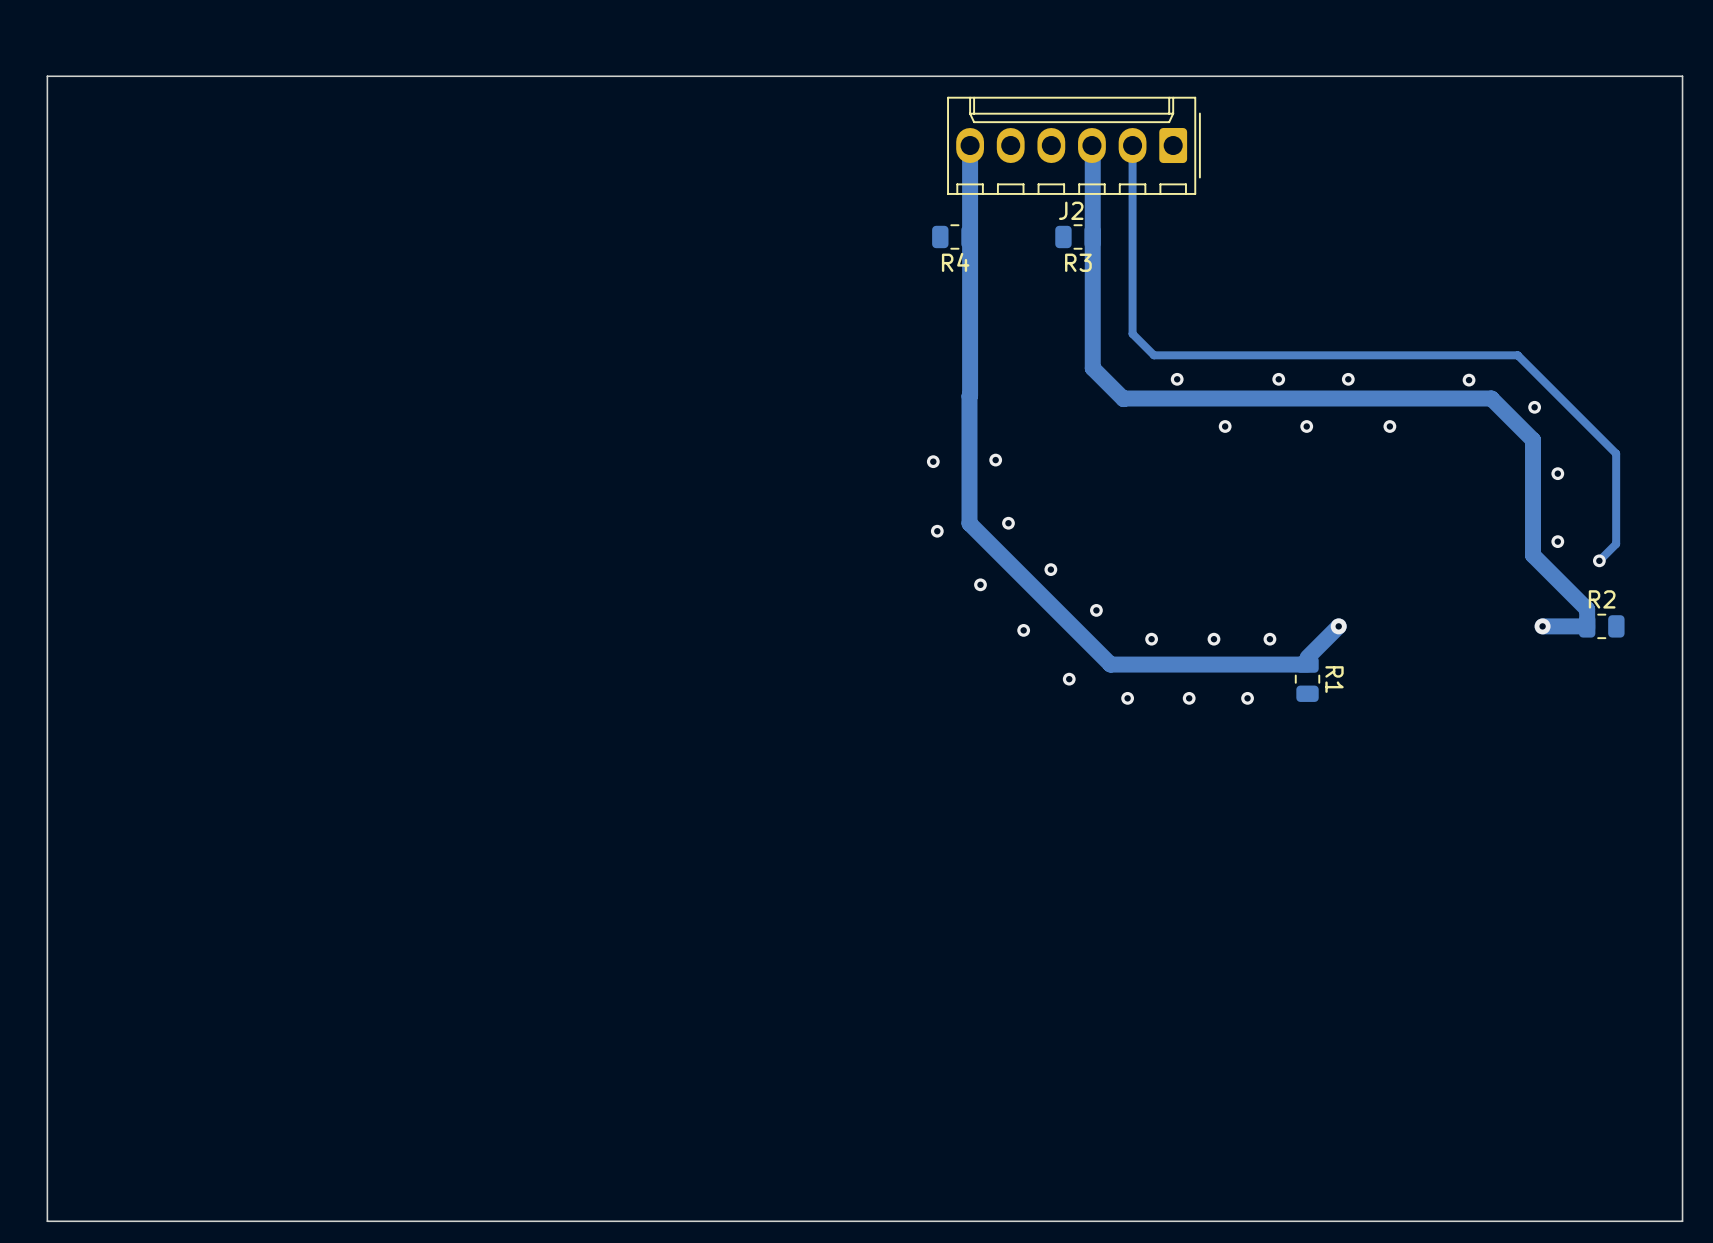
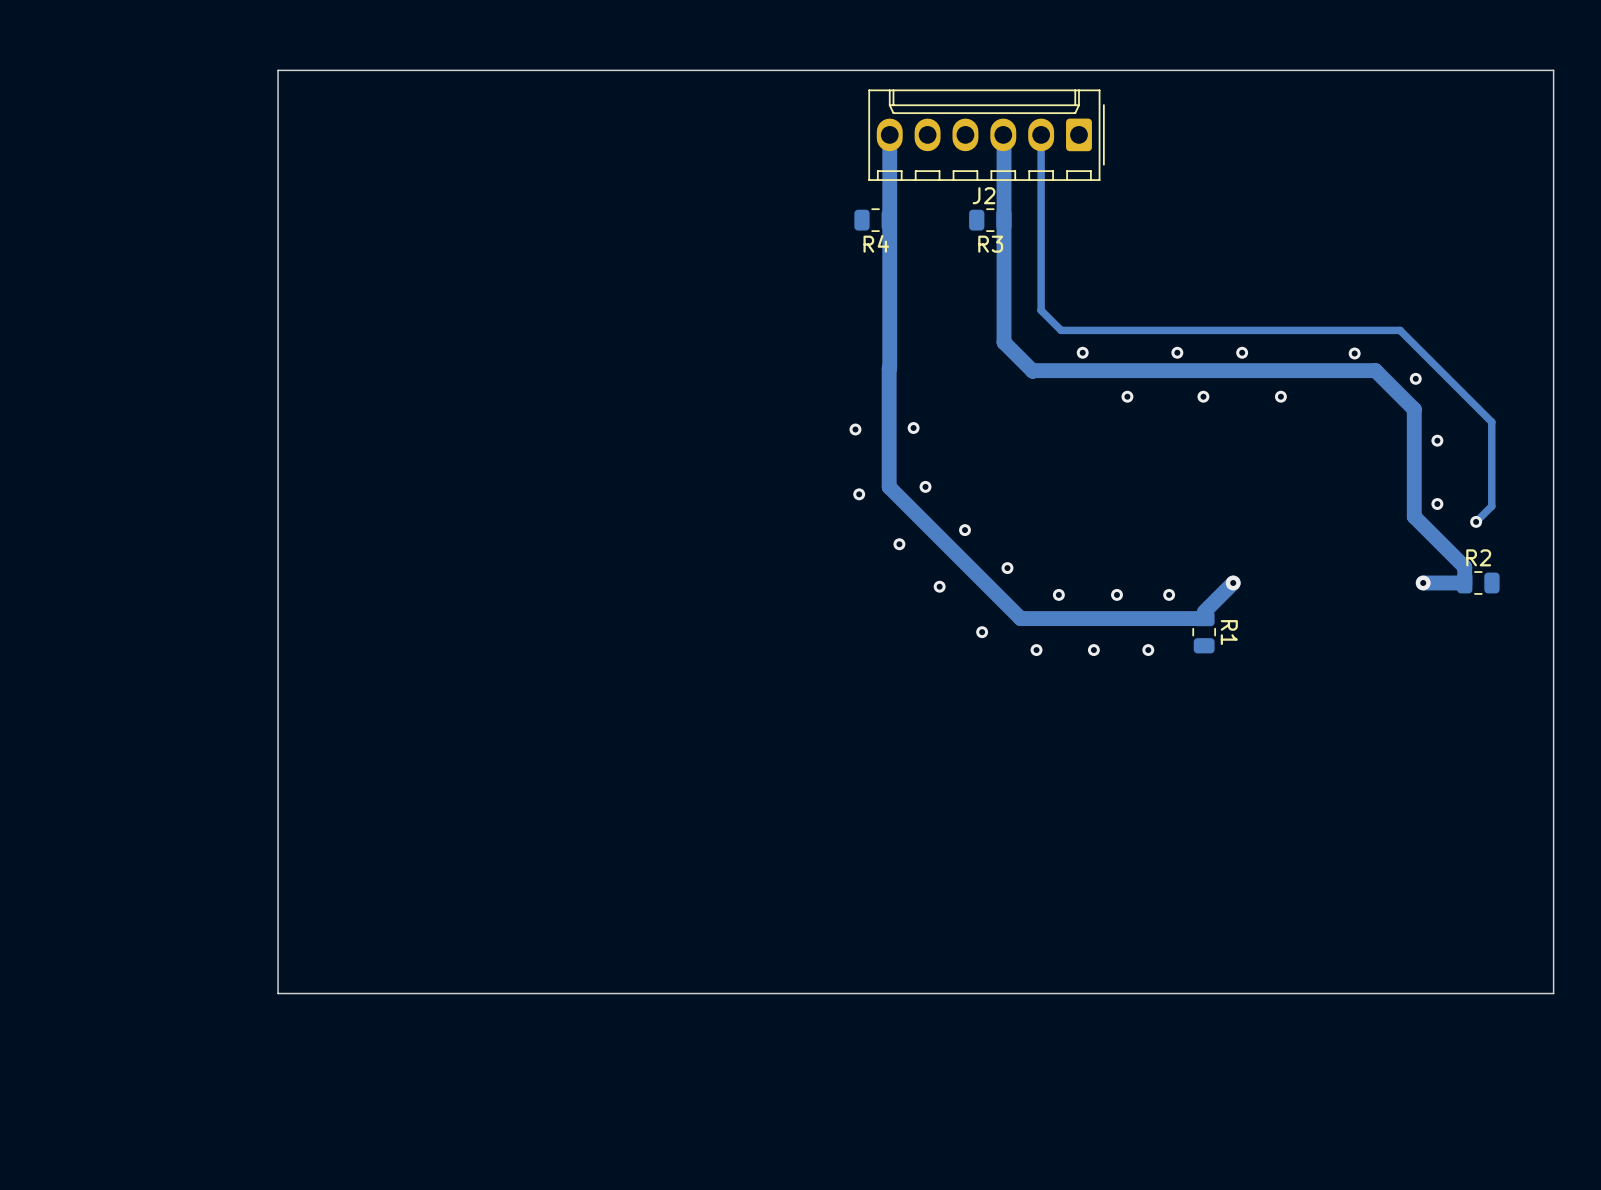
board edge: (313, 76) (47, 76) (47, 1221) (1682, 1221) (1682, 1066) -> (278, 70) (278, 993) (1553, 993)

